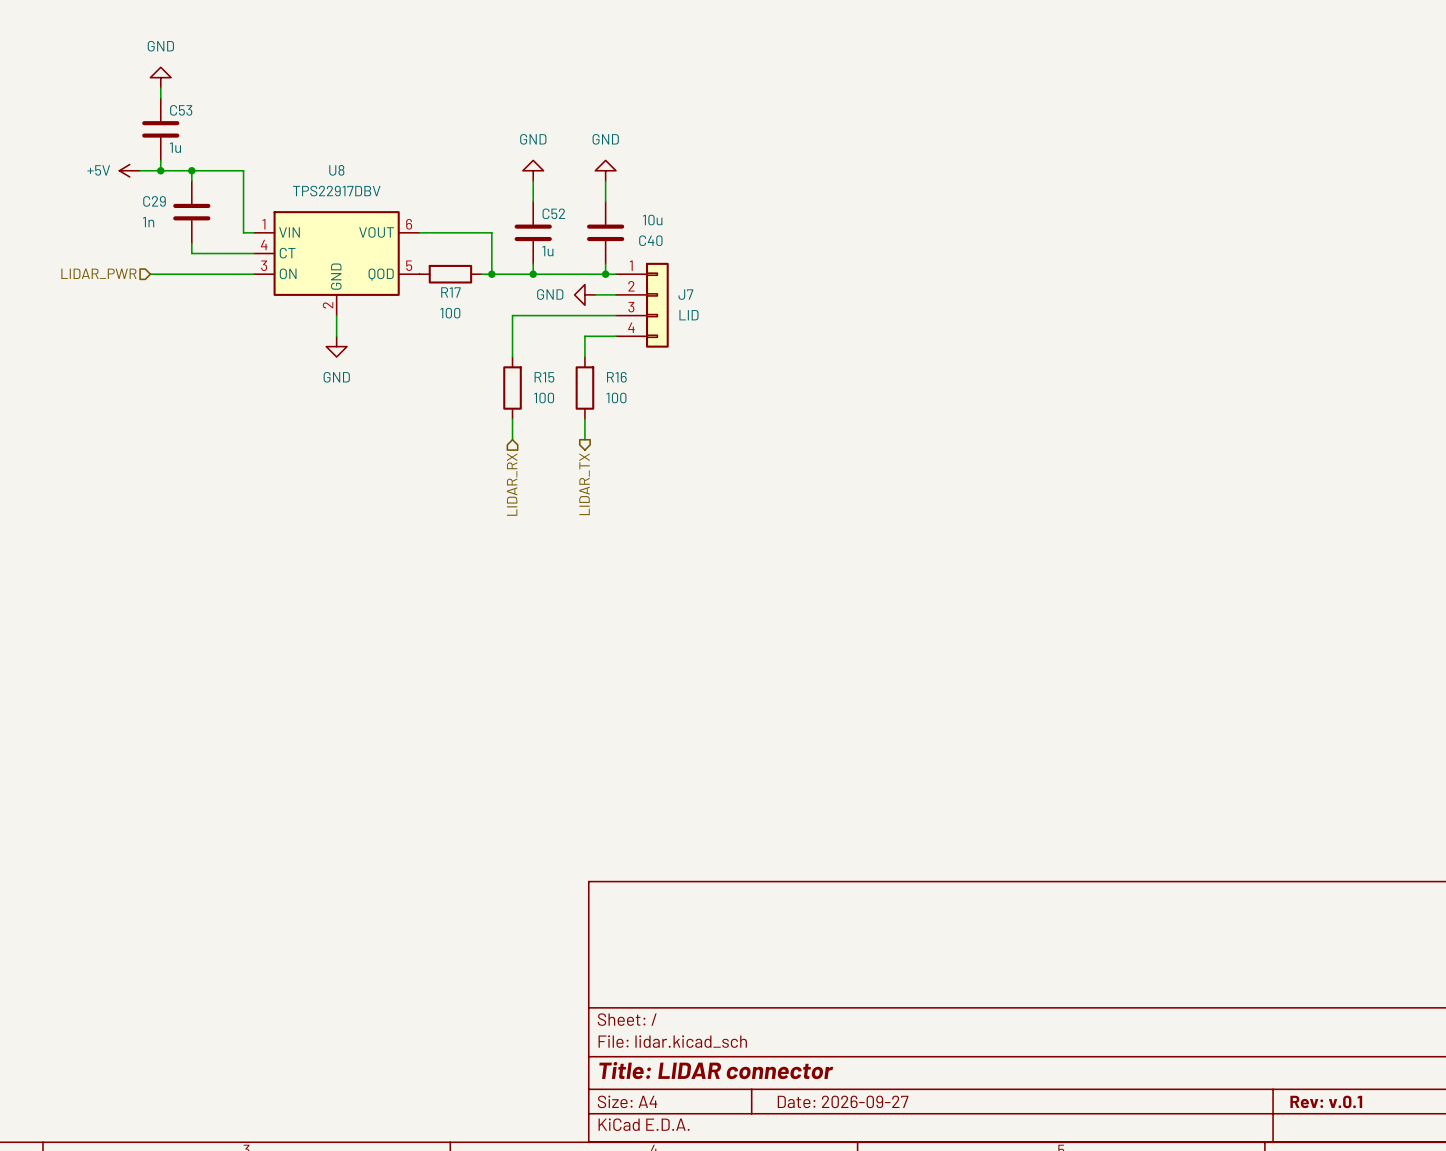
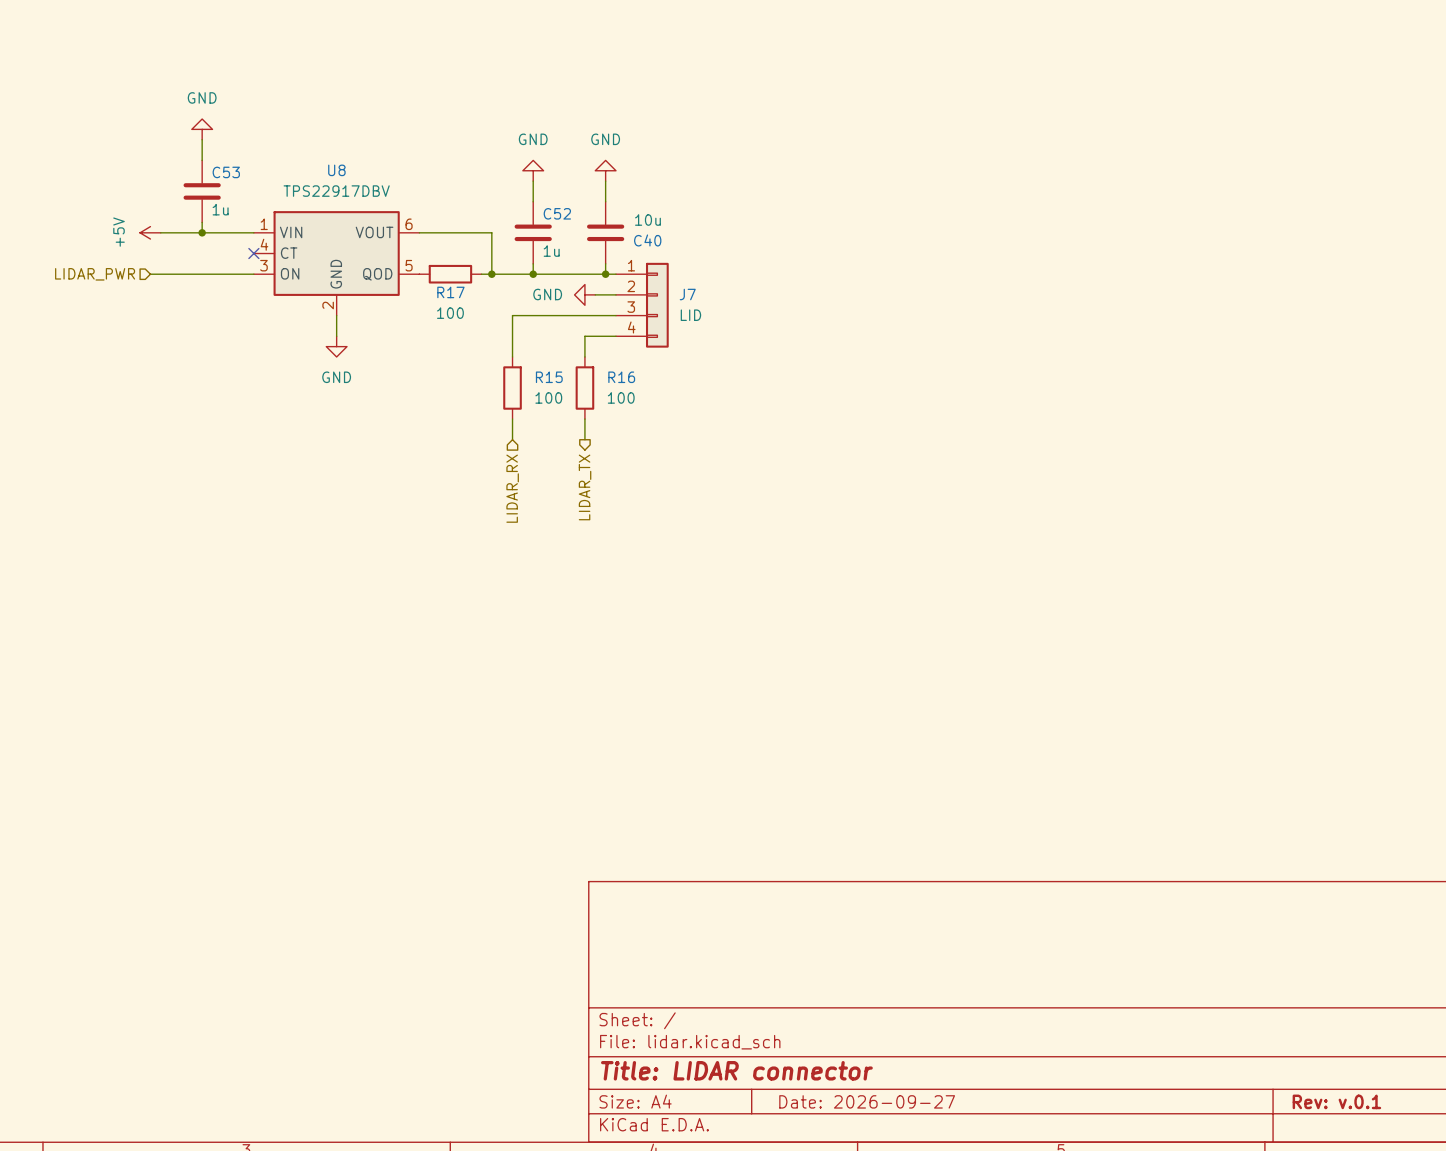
power symbol position: GND (160, 77) -> GND (202, 129)
wire: (160, 87) (160, 98) -> none
C53 position: (160, 129) -> (202, 191)
wire: none -> (202, 139) (202, 160)
wire: (160, 160) (160, 170) -> none
power symbol text rotation: 0° (98, 170) -> 90° counterclockwise (119, 232)
power symbol position: +5V (129, 170) -> +5V (150, 232)
wire: (140, 170) (243, 170) (243, 232) -> (160, 232) (243, 232)
junction: (160, 170) -> none
wire: (191, 170) (191, 181) -> (202, 222) (202, 232)
junction: (191, 170) -> none
C29: 1n (191, 212) -> none
junction: none -> (202, 232)
wire: (191, 243) (191, 253) (253, 253) -> none
no-connect mark: none -> (253, 253)

